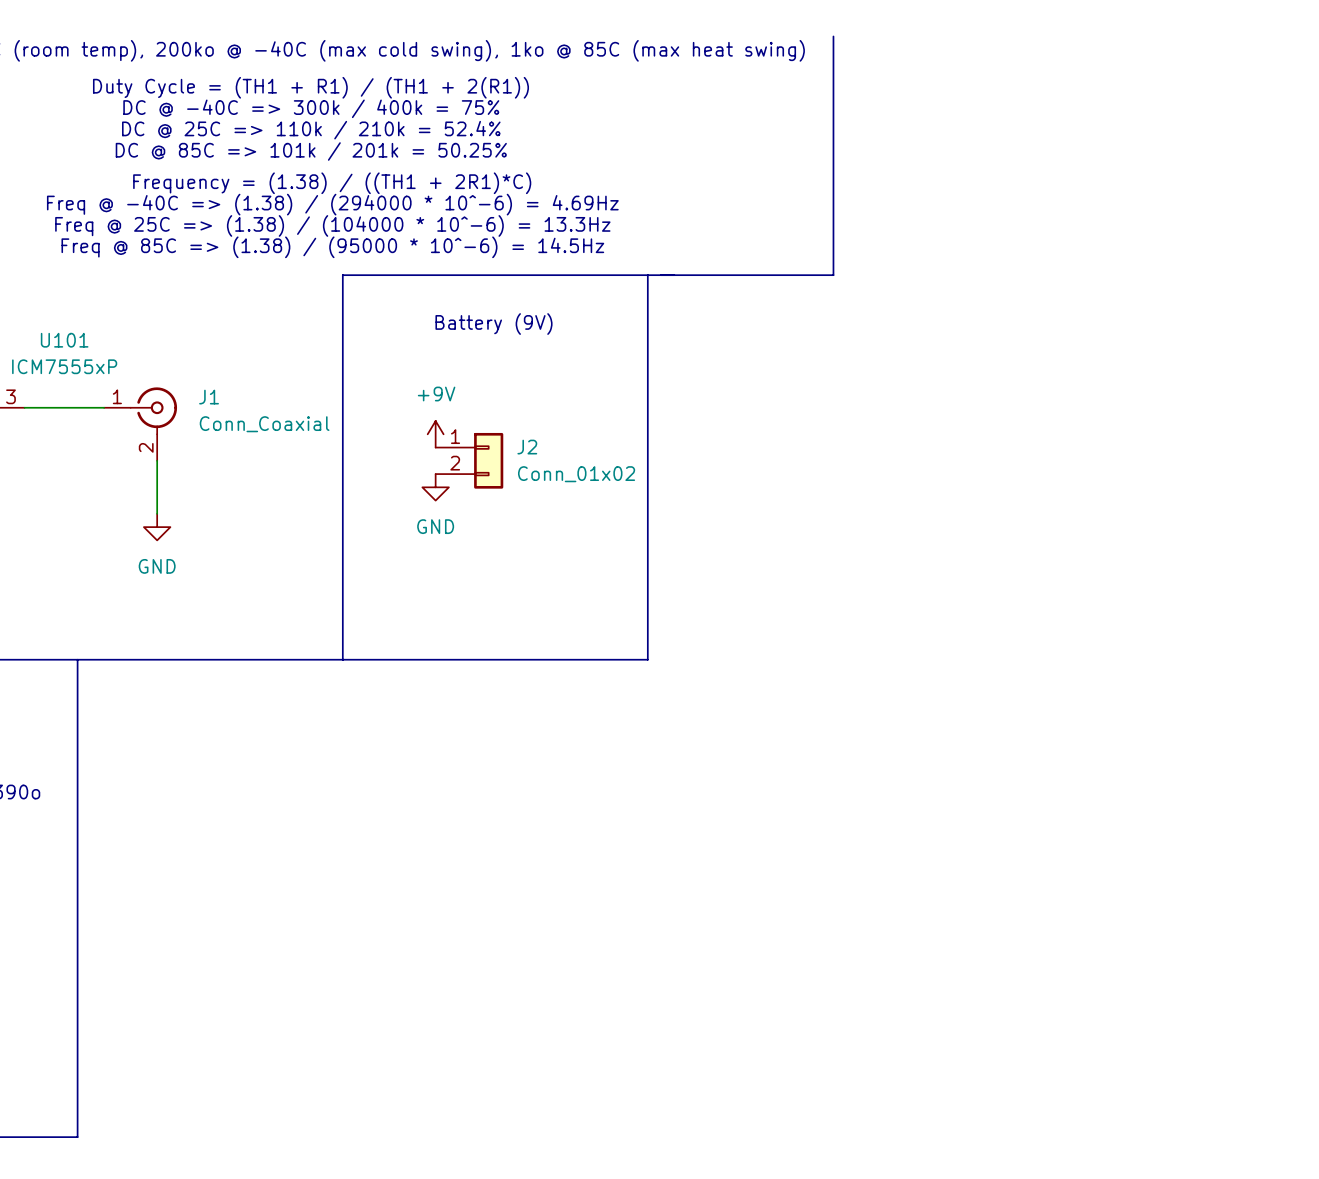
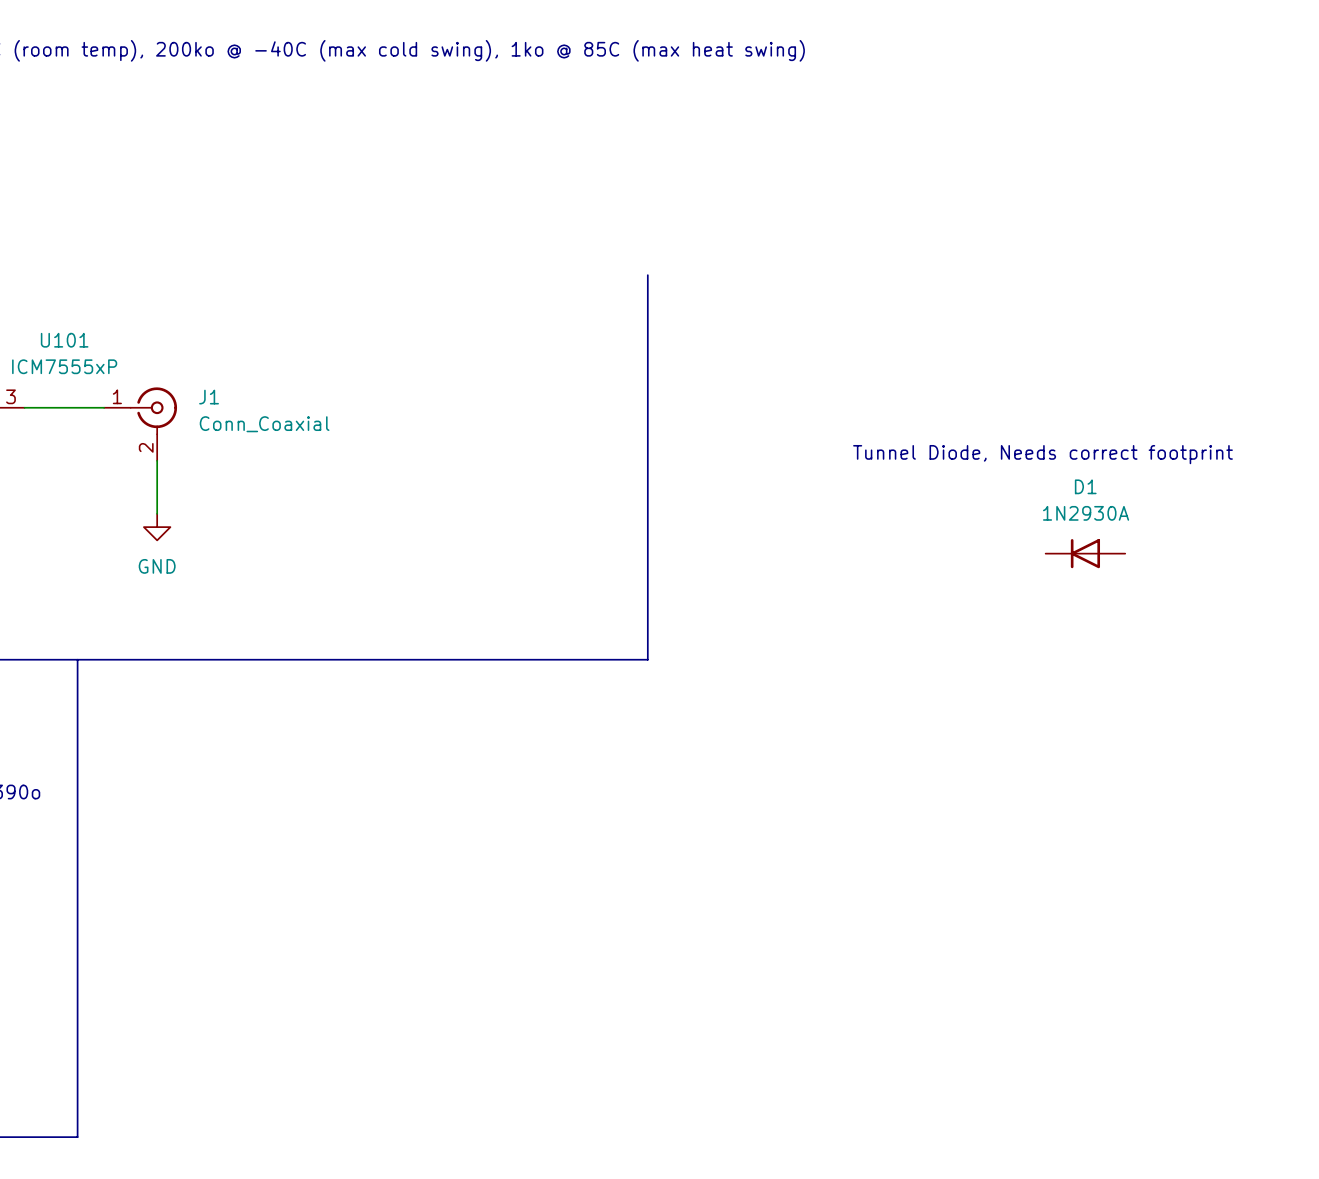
line: (833, 36) (833, 275) (342, 275) (342, 659) -> none
text: Duty Cycle = (TH1 + R1) / (TH1 + 2(R1)) (310, 87) -> none
text: DC @ -40C => 300k / 400k = 75% (311, 108) -> none
text: DC @ 25C => 110k / 210k = 52.4% (311, 130) -> none
text: DC @ 85C => 101k / 201k = 50.25% (311, 151) -> none
text: Frequency = (1.38) / ((TH1 + 2R1)*C) (332, 183) -> none
text: Freq @ -40C => (1.38) / (294000 * 10^-6) = 4.69Hz (332, 204) -> none
text: Freq @ 25C => (1.38) / (104000 * 10^-6) = 13.3Hz (332, 225) -> none
text: Freq @ 85C => (1.38) / (95000 * 10^-6) = 14.5Hz (332, 247) -> none
text: Battery (9V) (493, 324) -> none
power symbol: +9V (435, 434) -> none
text: none -> Tunnel Diode, Needs correct footprint (1042, 454)
J2: Conn_01x02 (469, 460) -> none
power symbol: GND (435, 487) -> none
D1: none -> 1N2930A (1085, 553)

